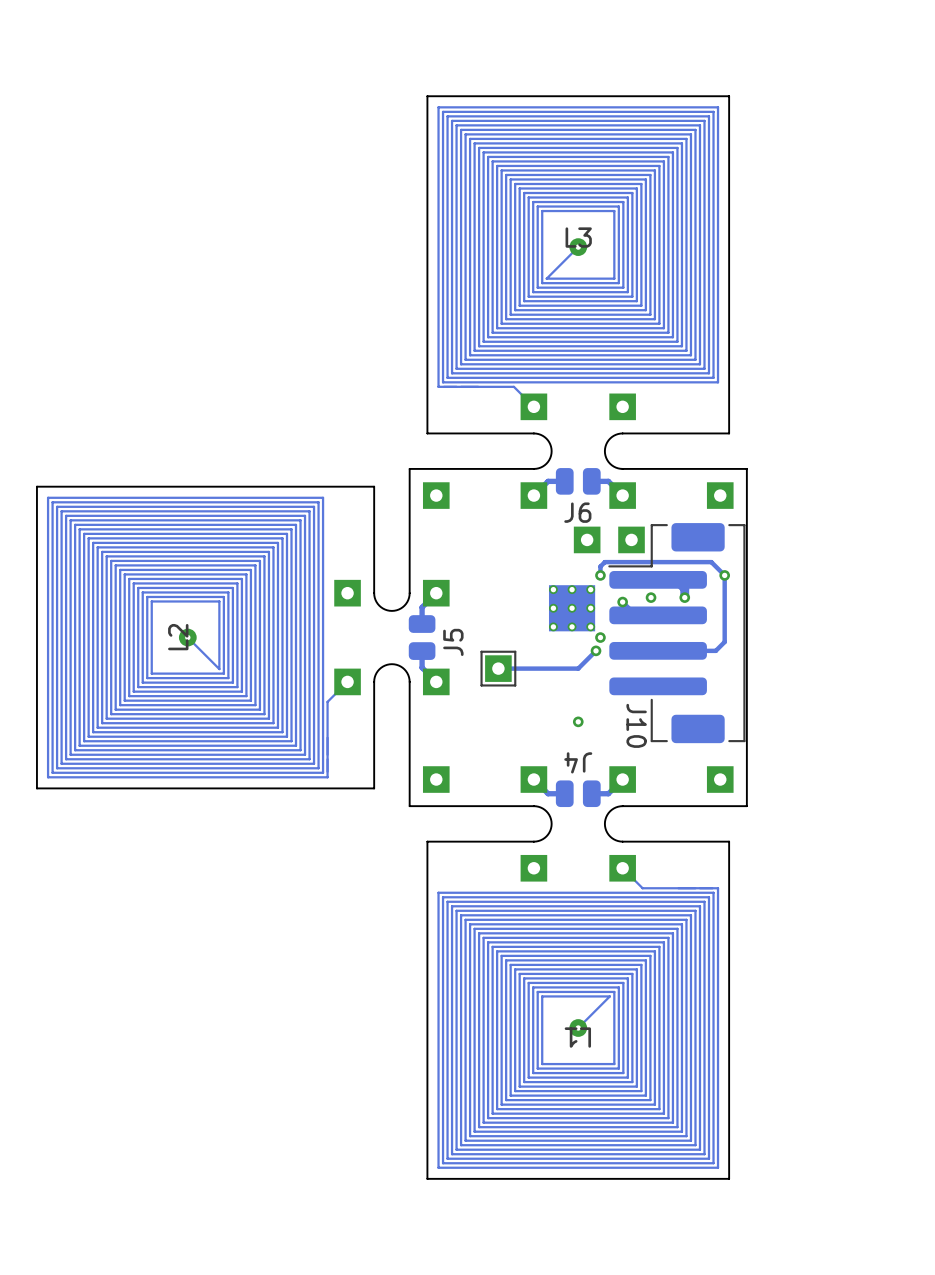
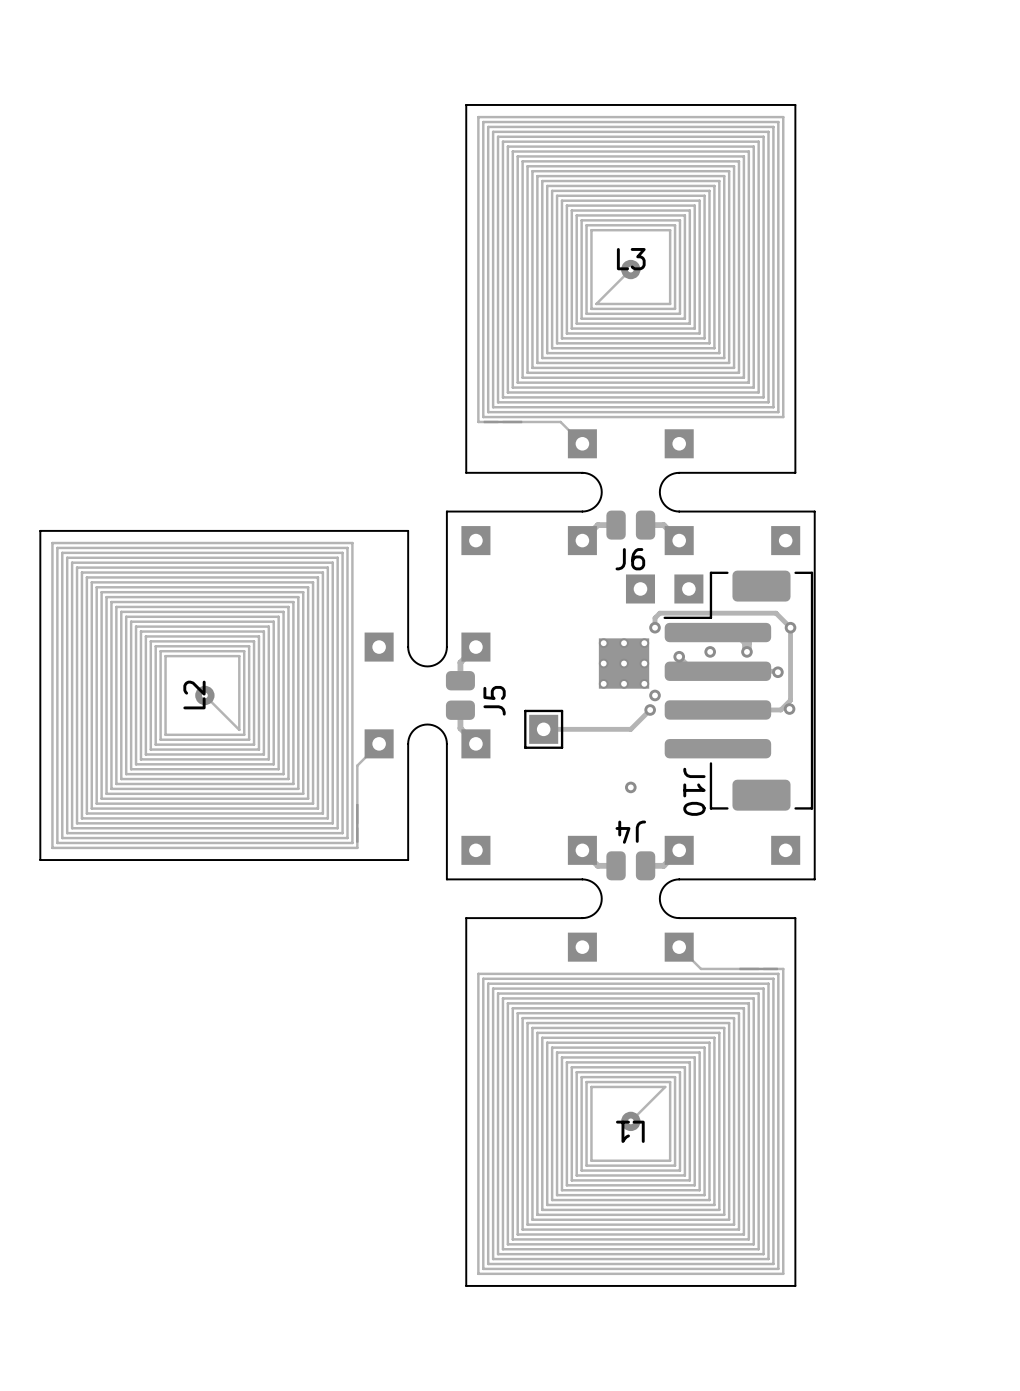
via: none -> (777, 672)
via: none -> (789, 709)

